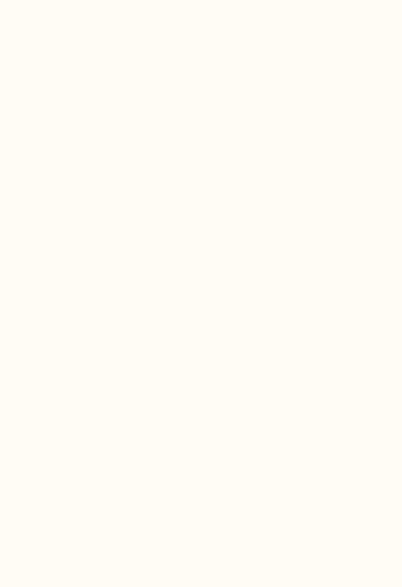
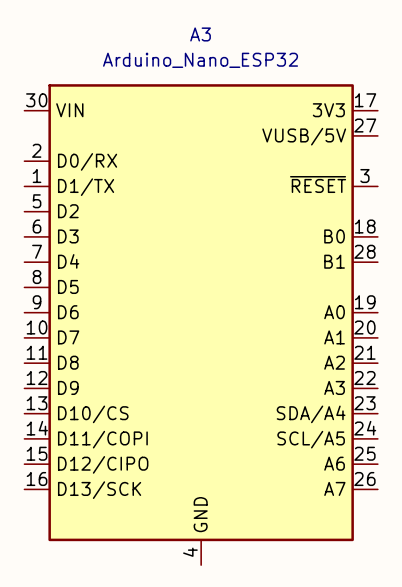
A3: none -> Arduino_Nano_ESP32 (201, 324)

